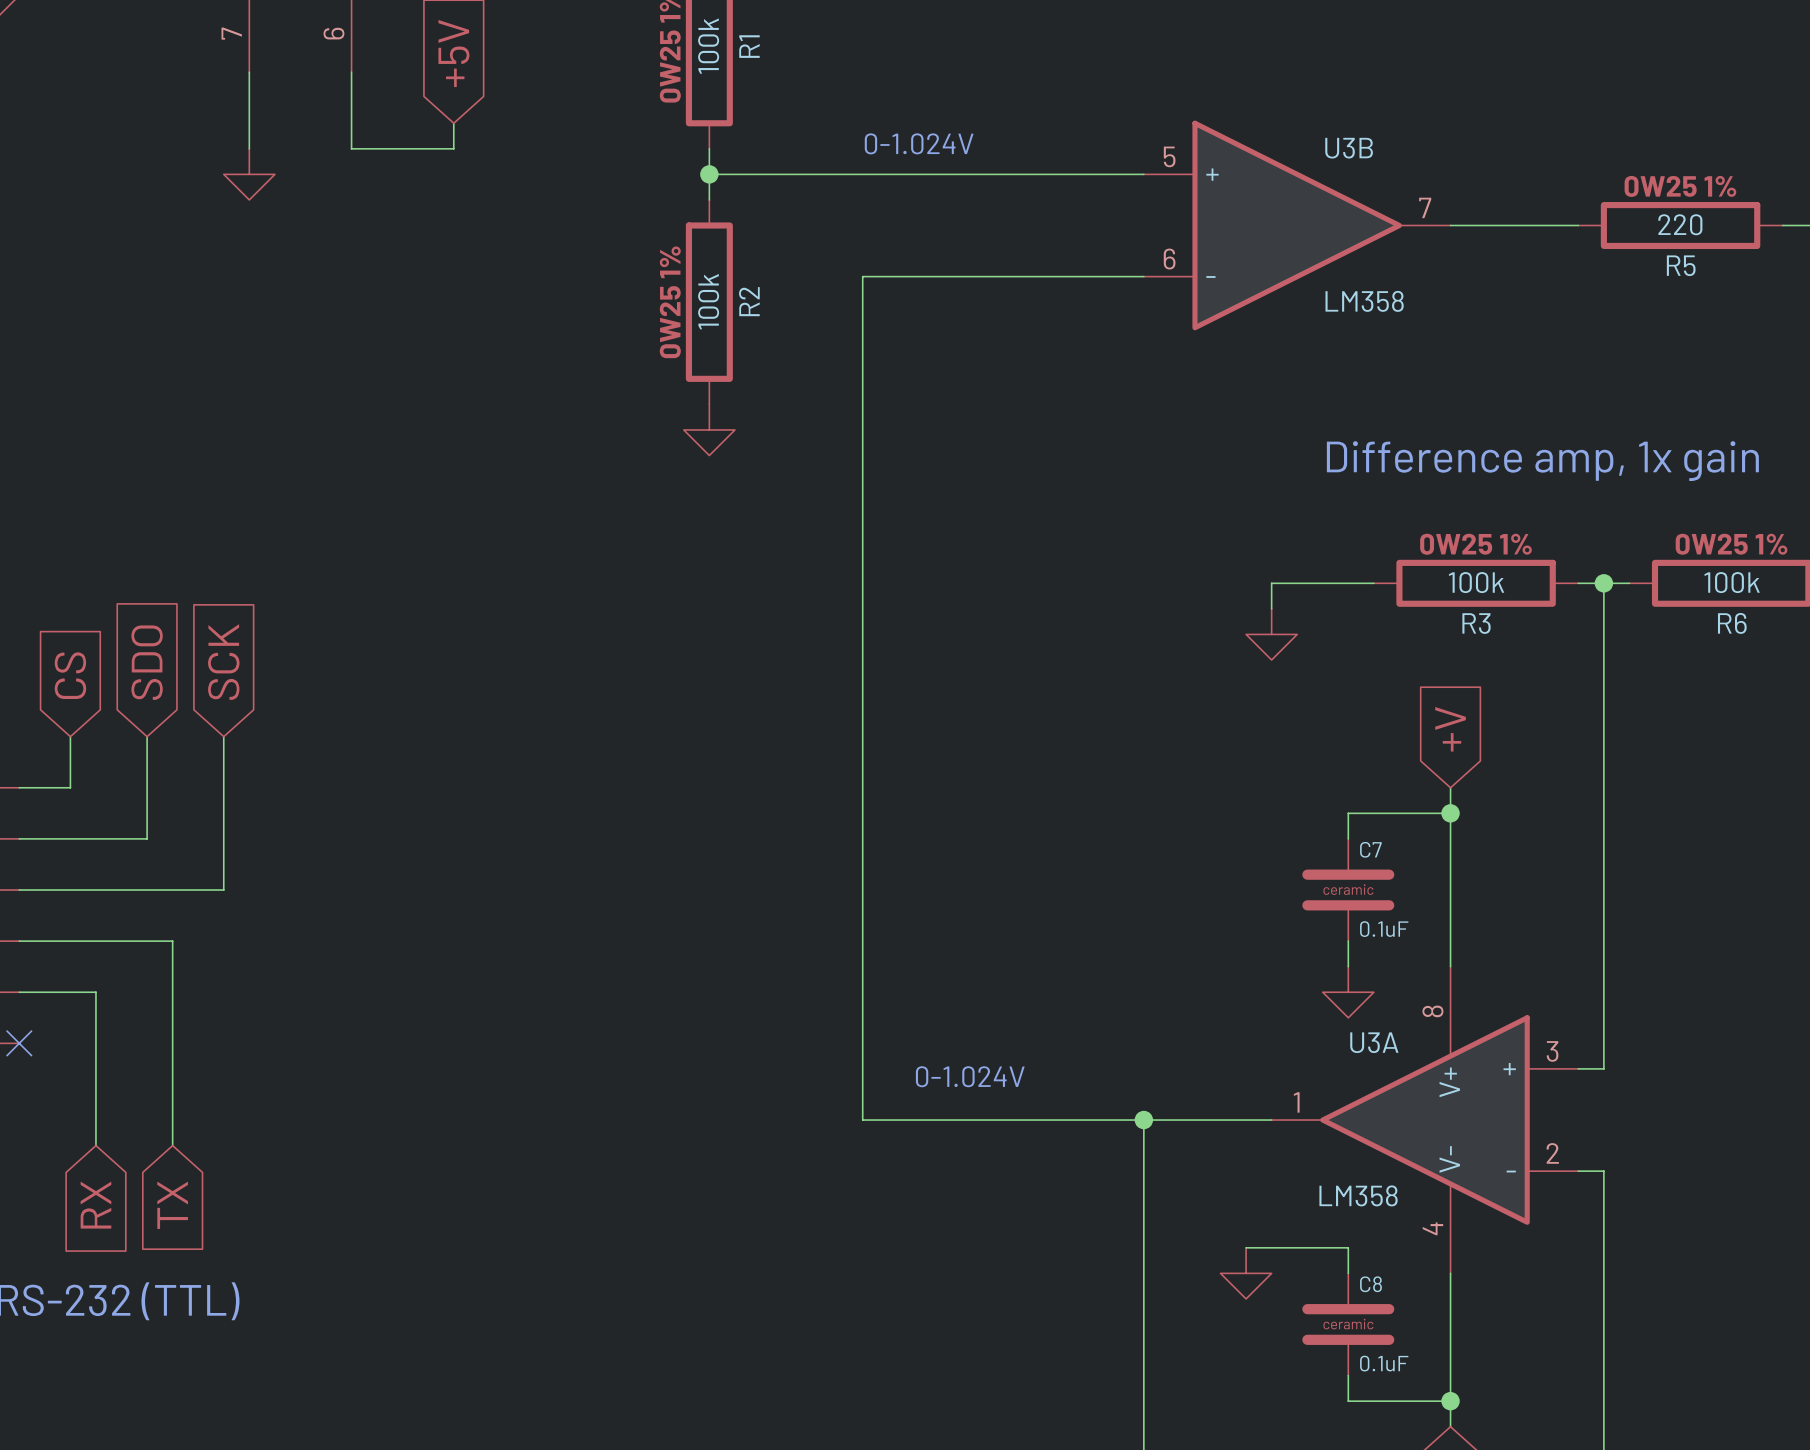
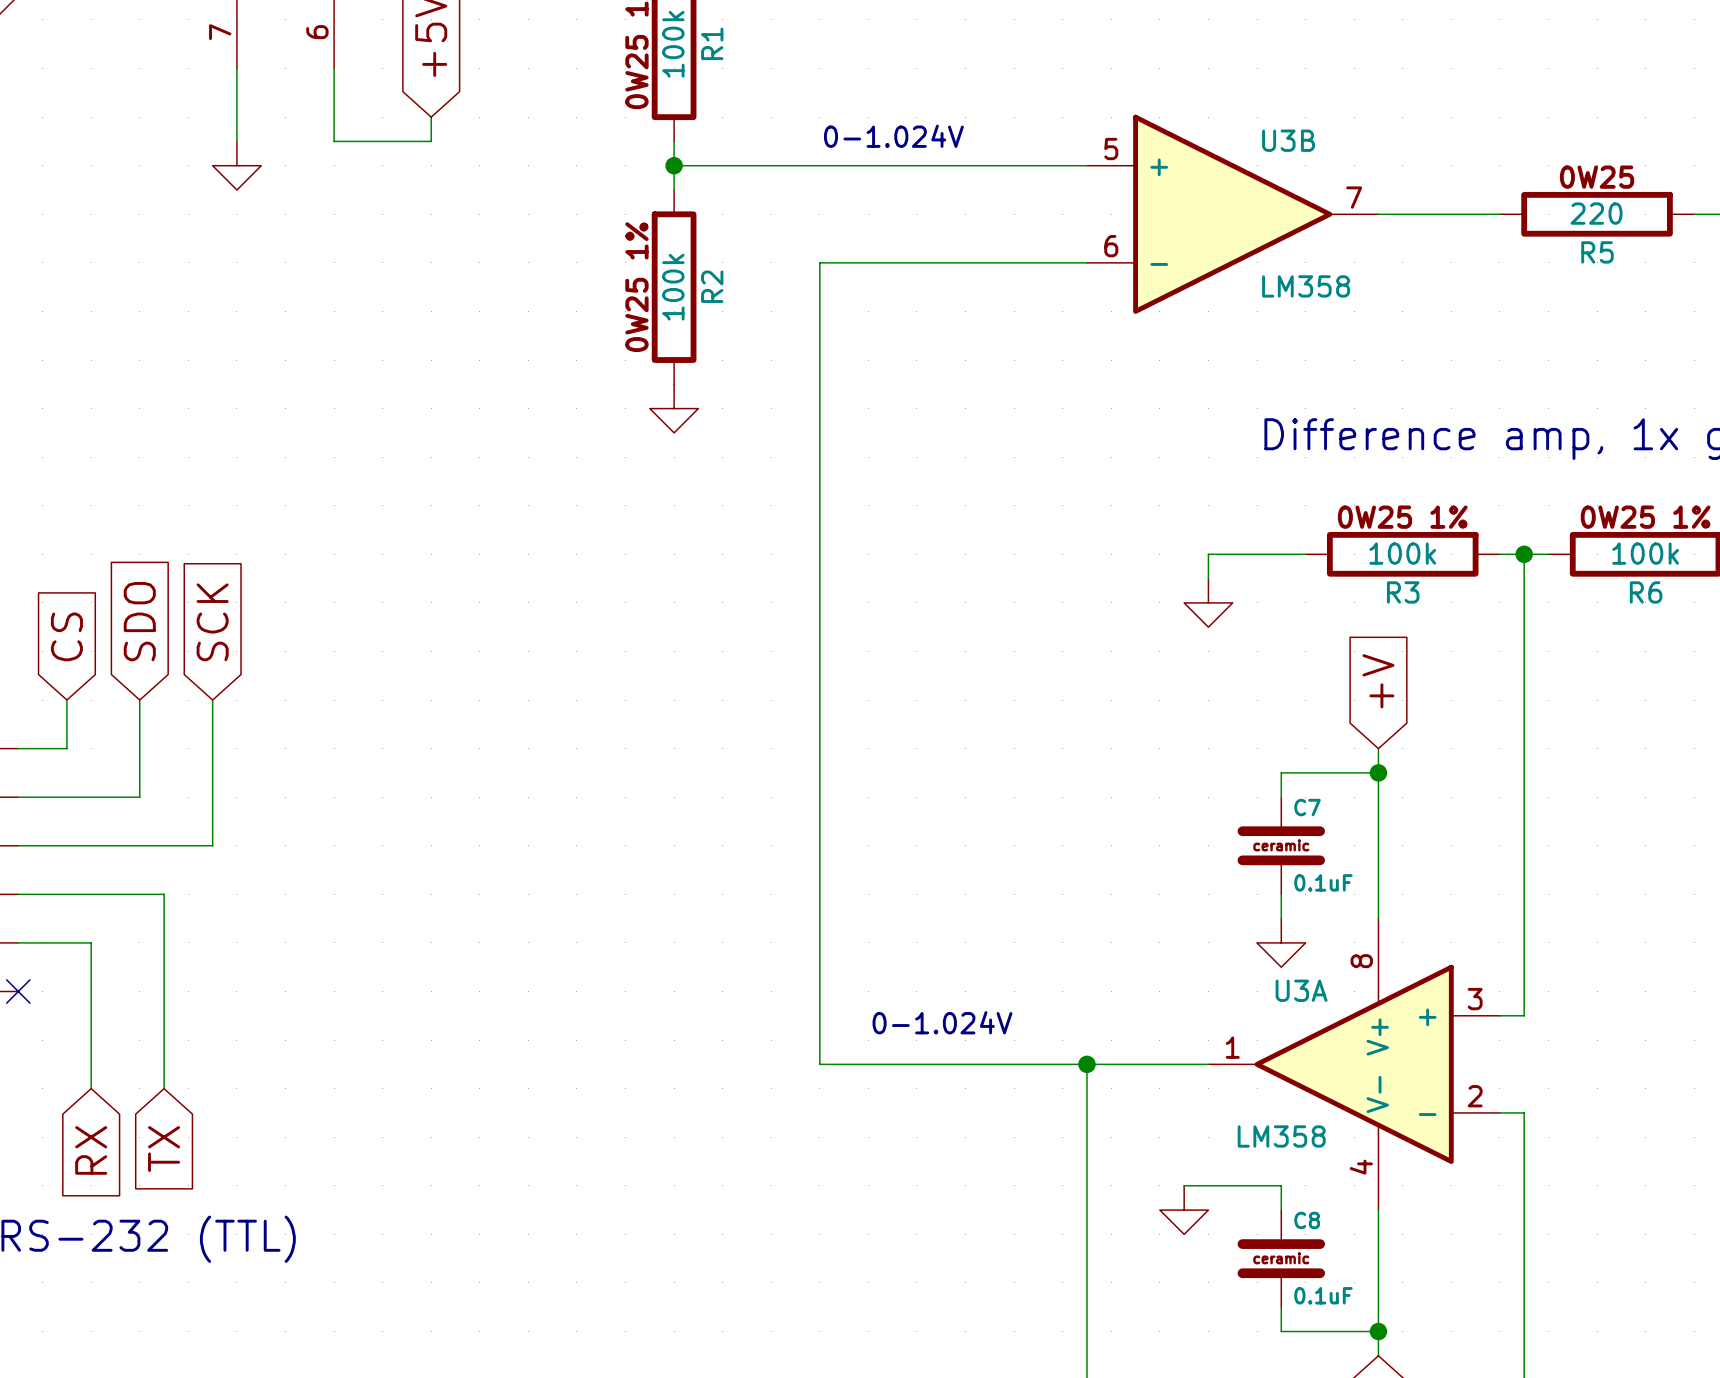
R5 text: 0W25 1% (1680, 186) -> 0W25 (1597, 177)

